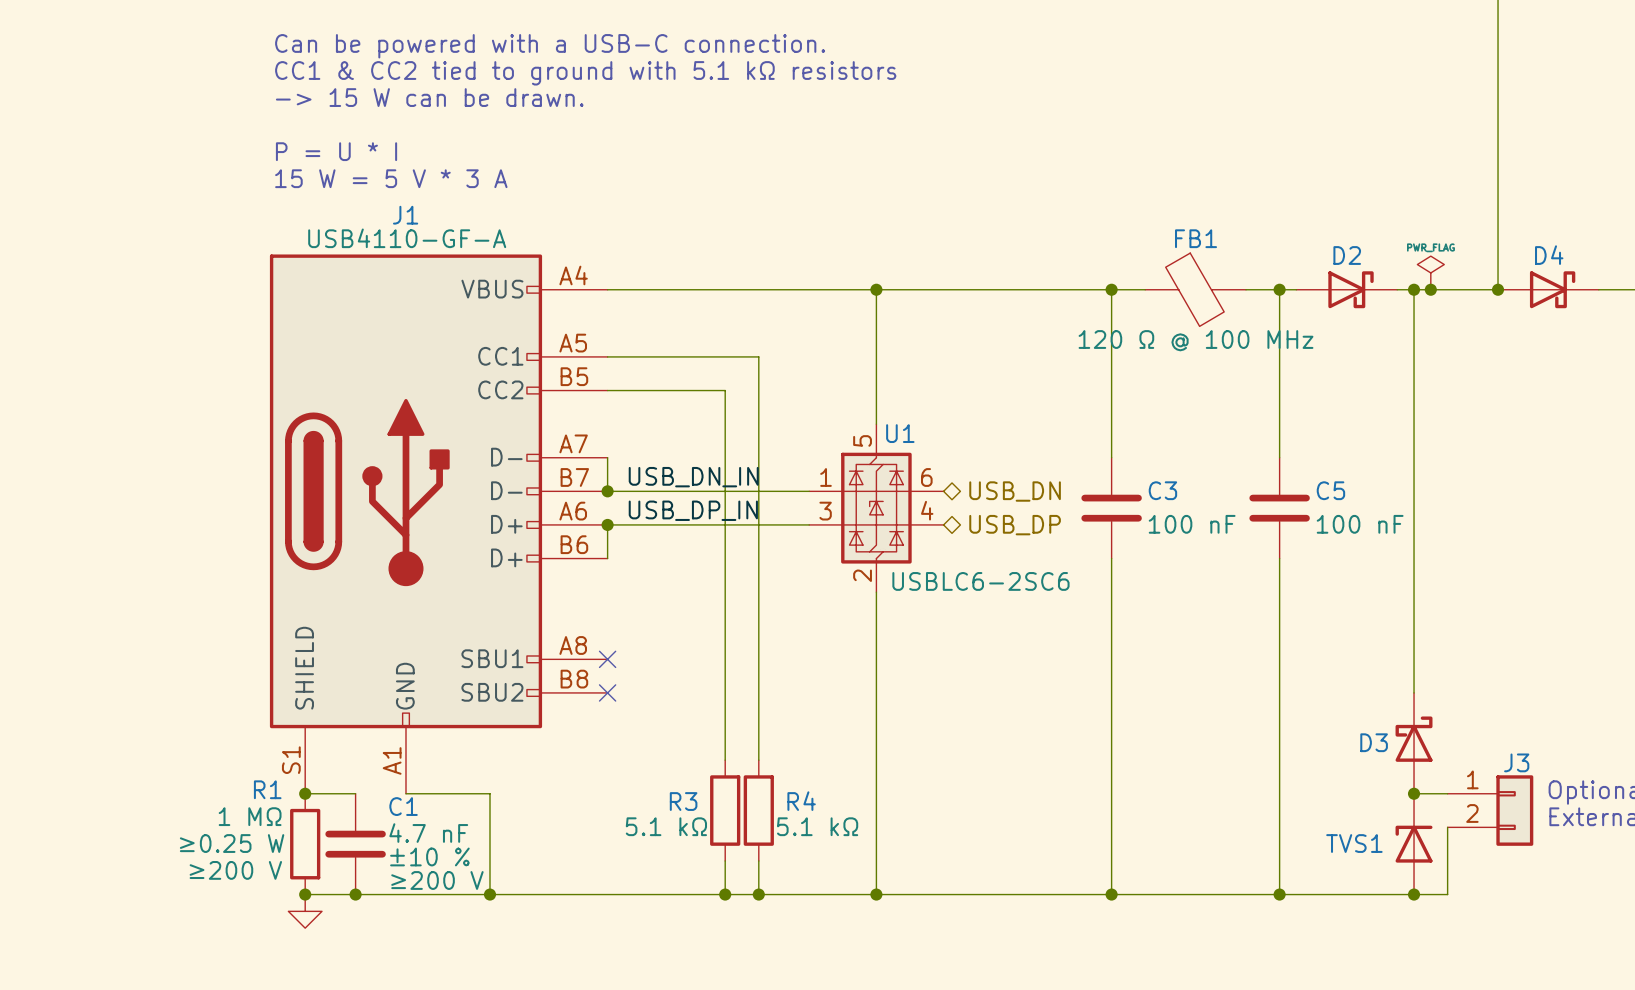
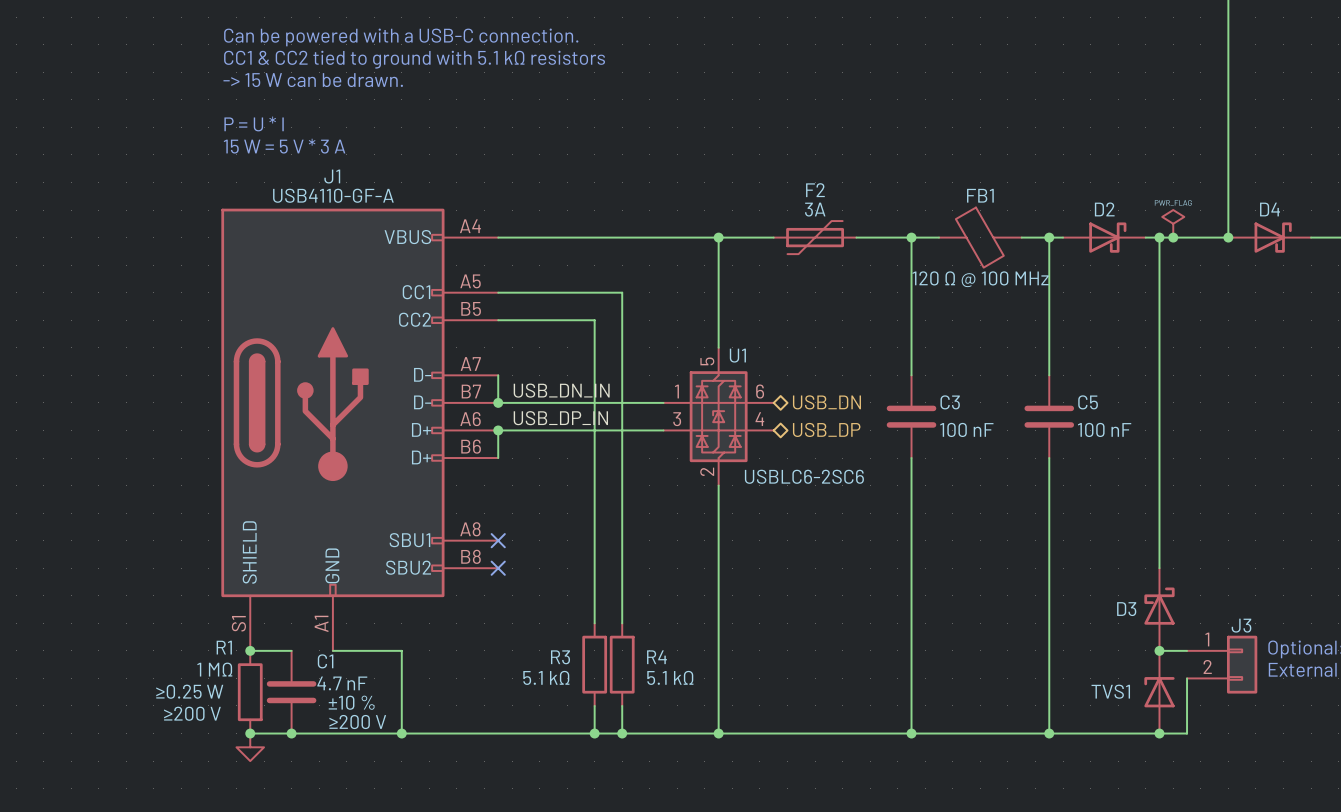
F2: none -> 3A (815, 237)

